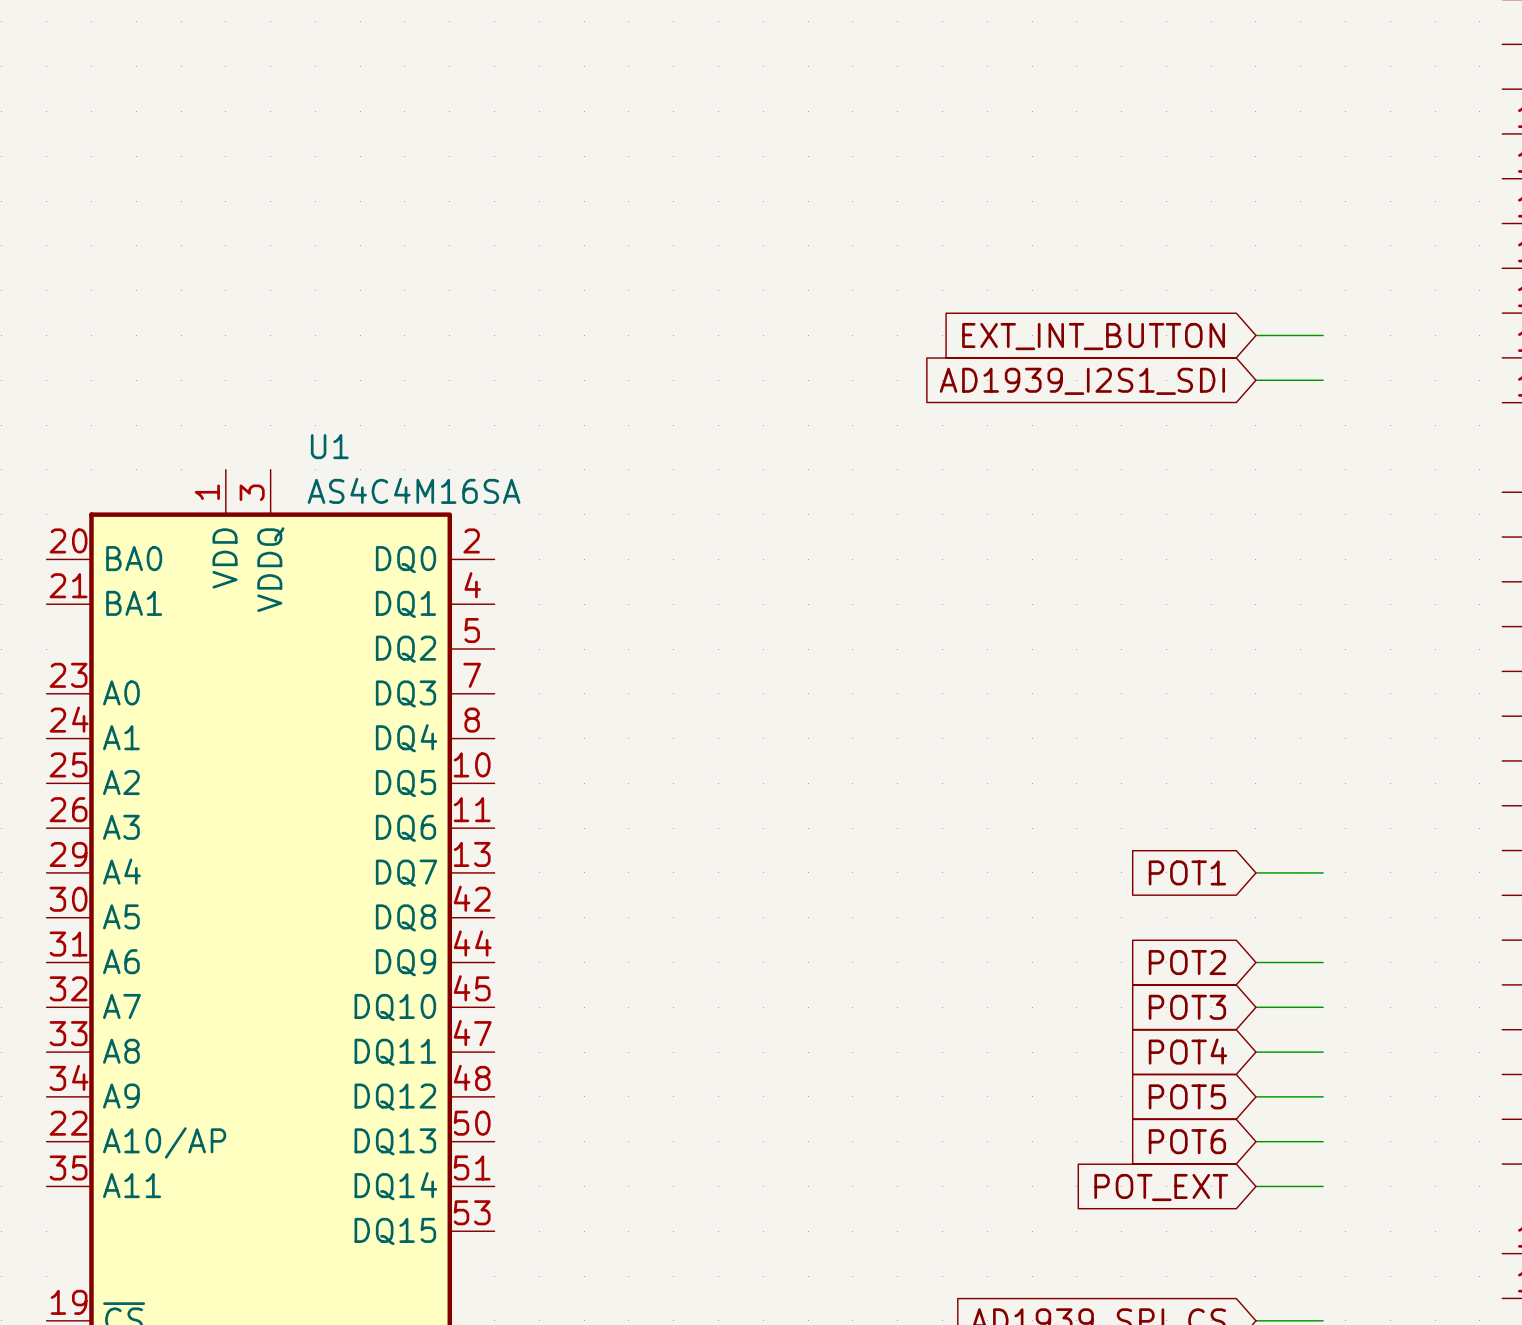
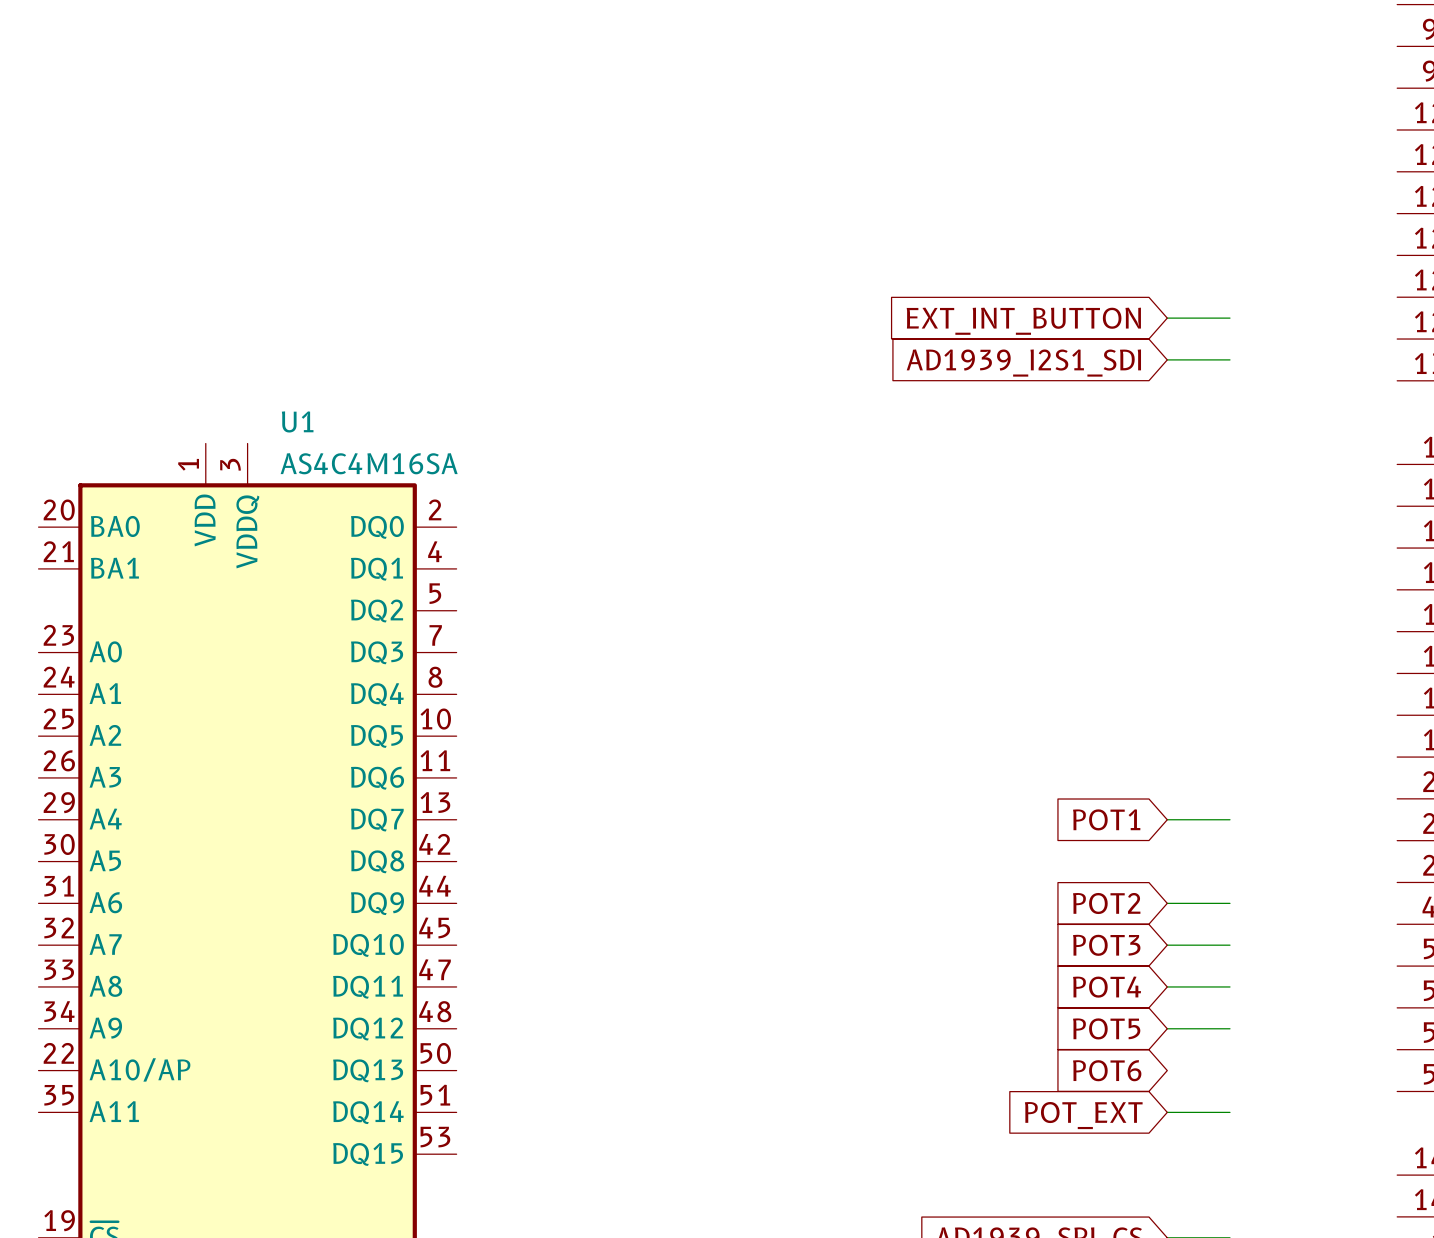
wire: (1255, 1141) (1323, 1141) -> none

